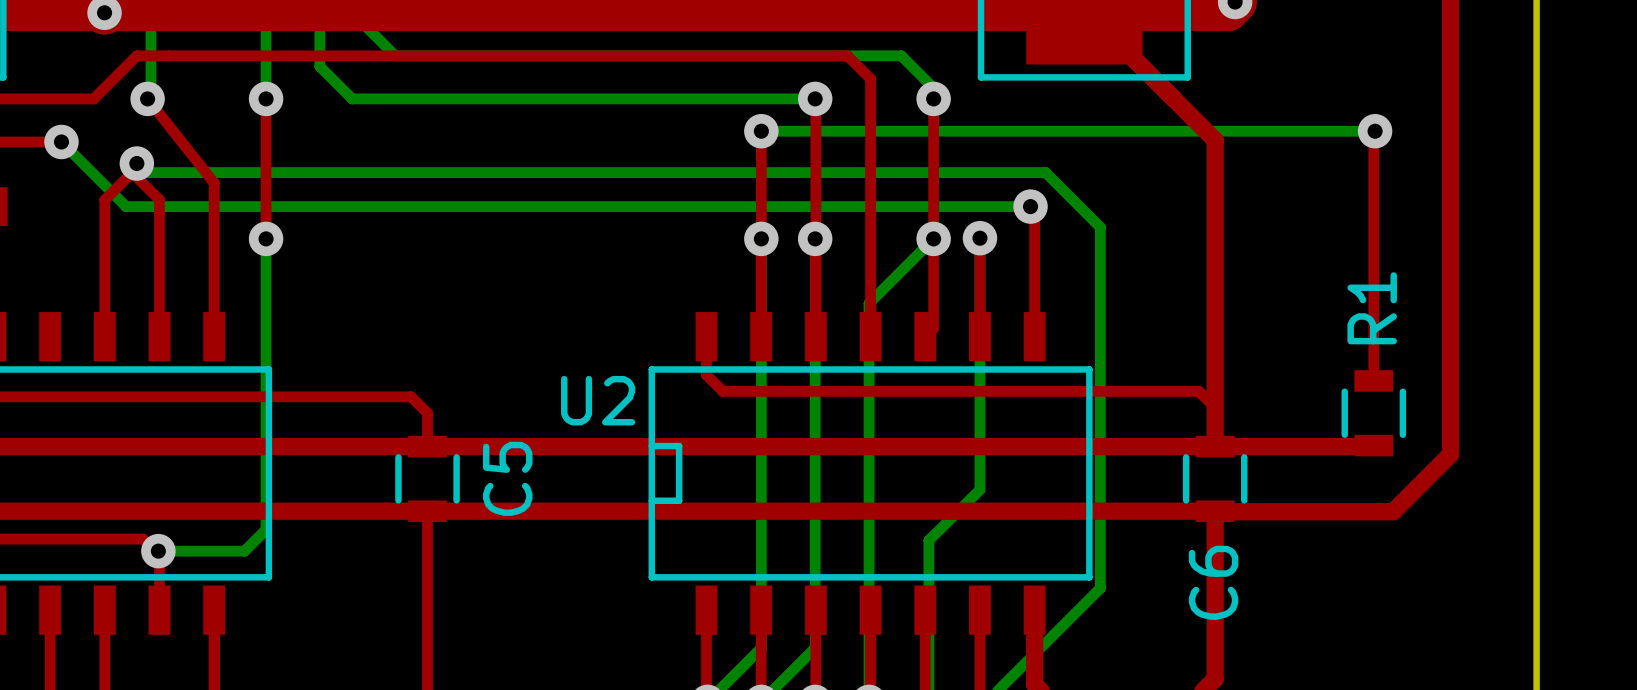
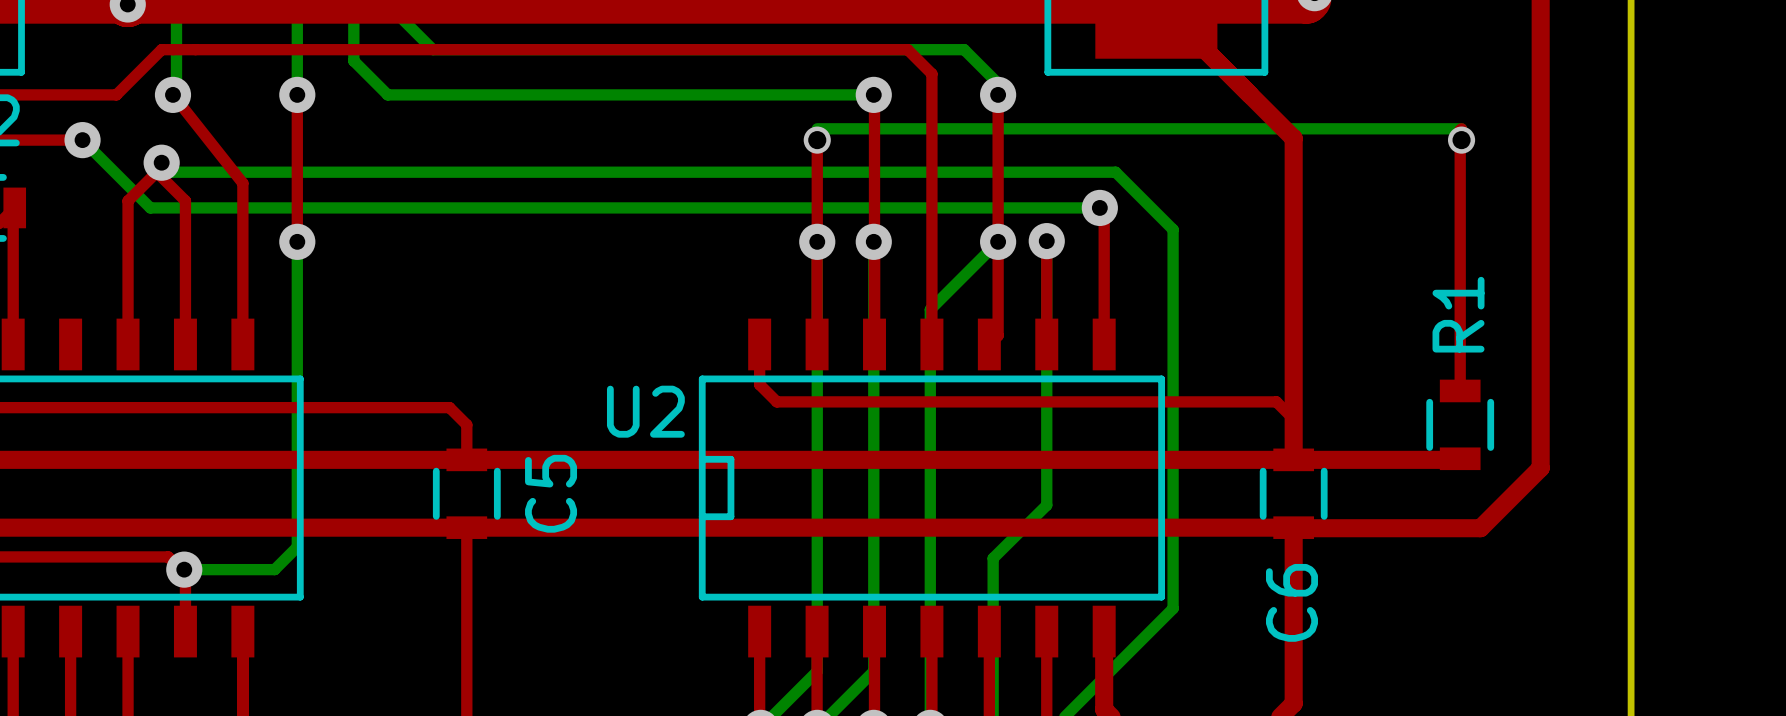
via size: [744, 113, 779, 149] -> [803, 126, 831, 154]
via size: [1357, 113, 1393, 149] -> [1447, 126, 1476, 154]

